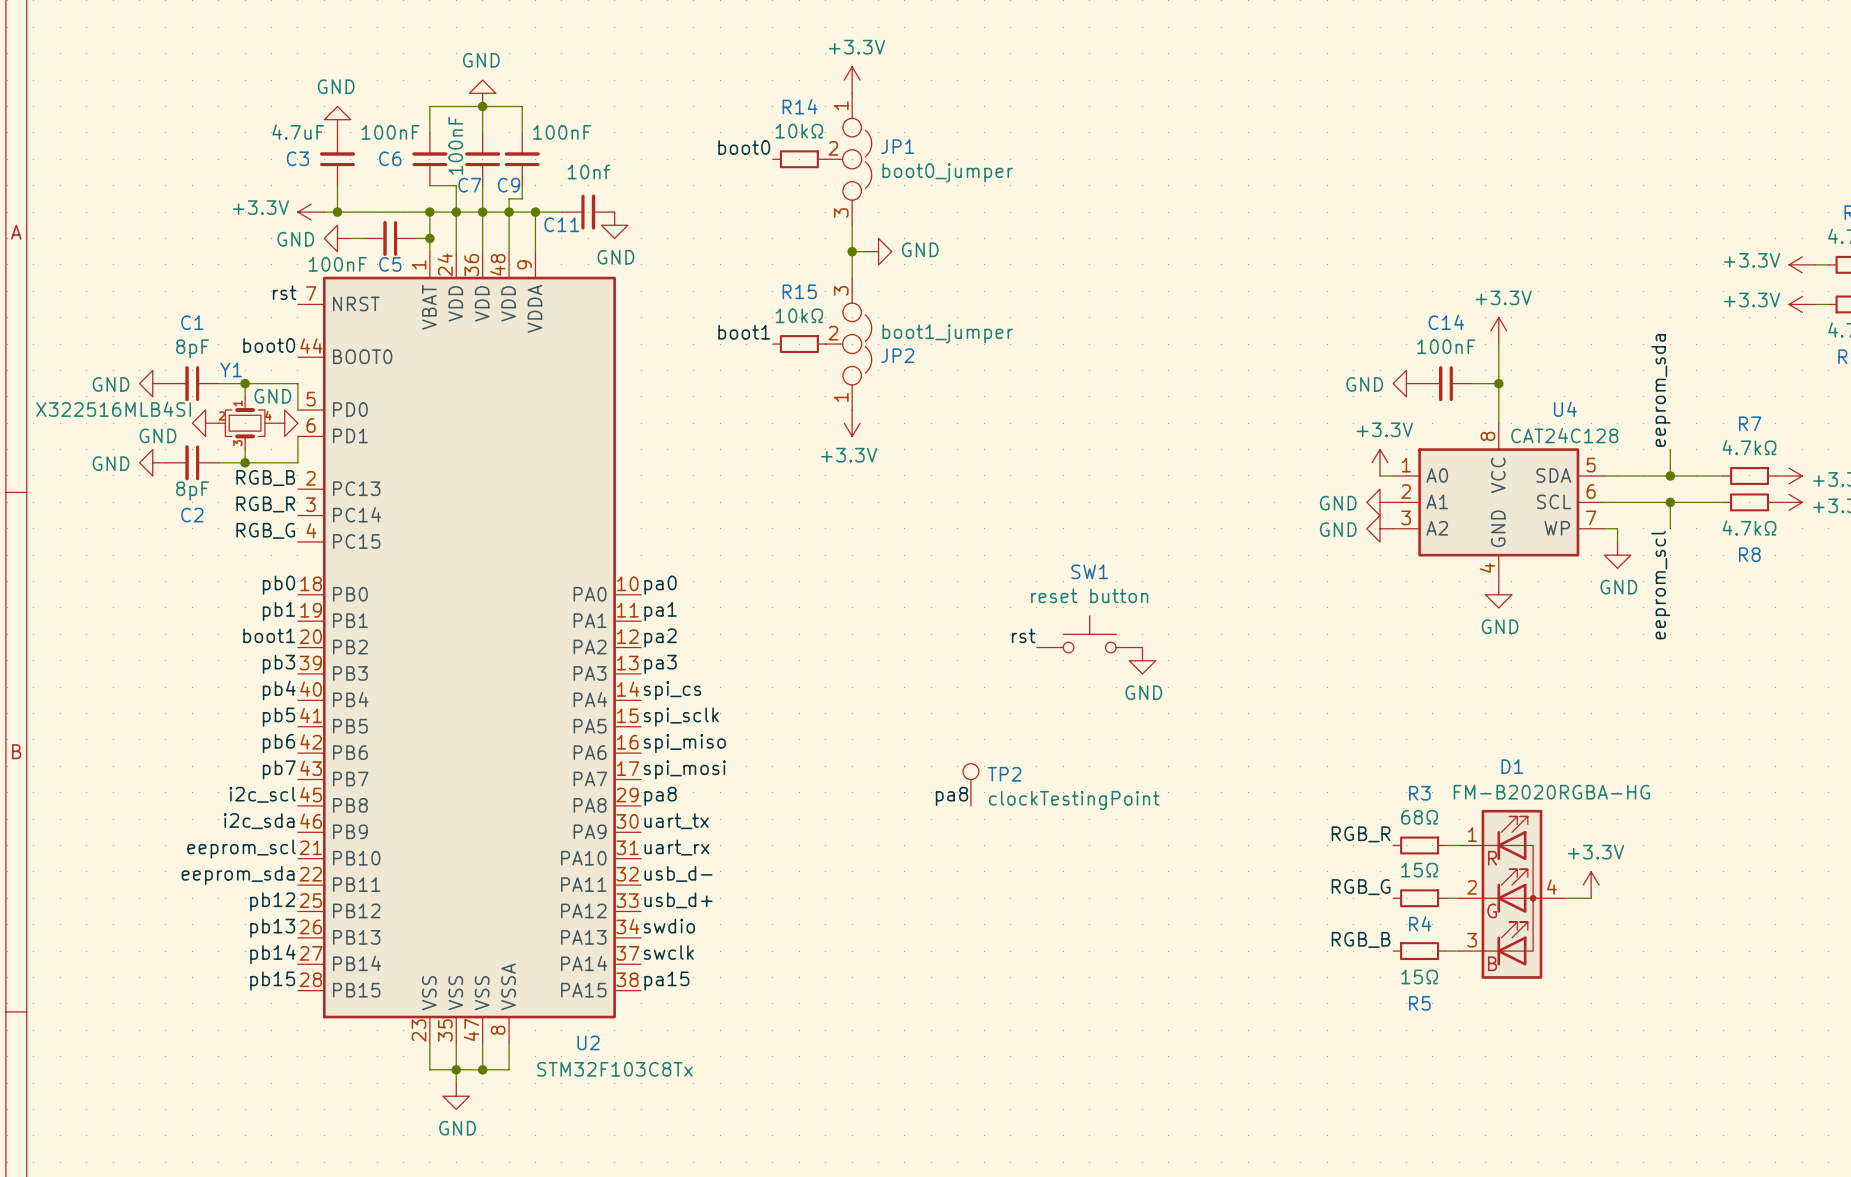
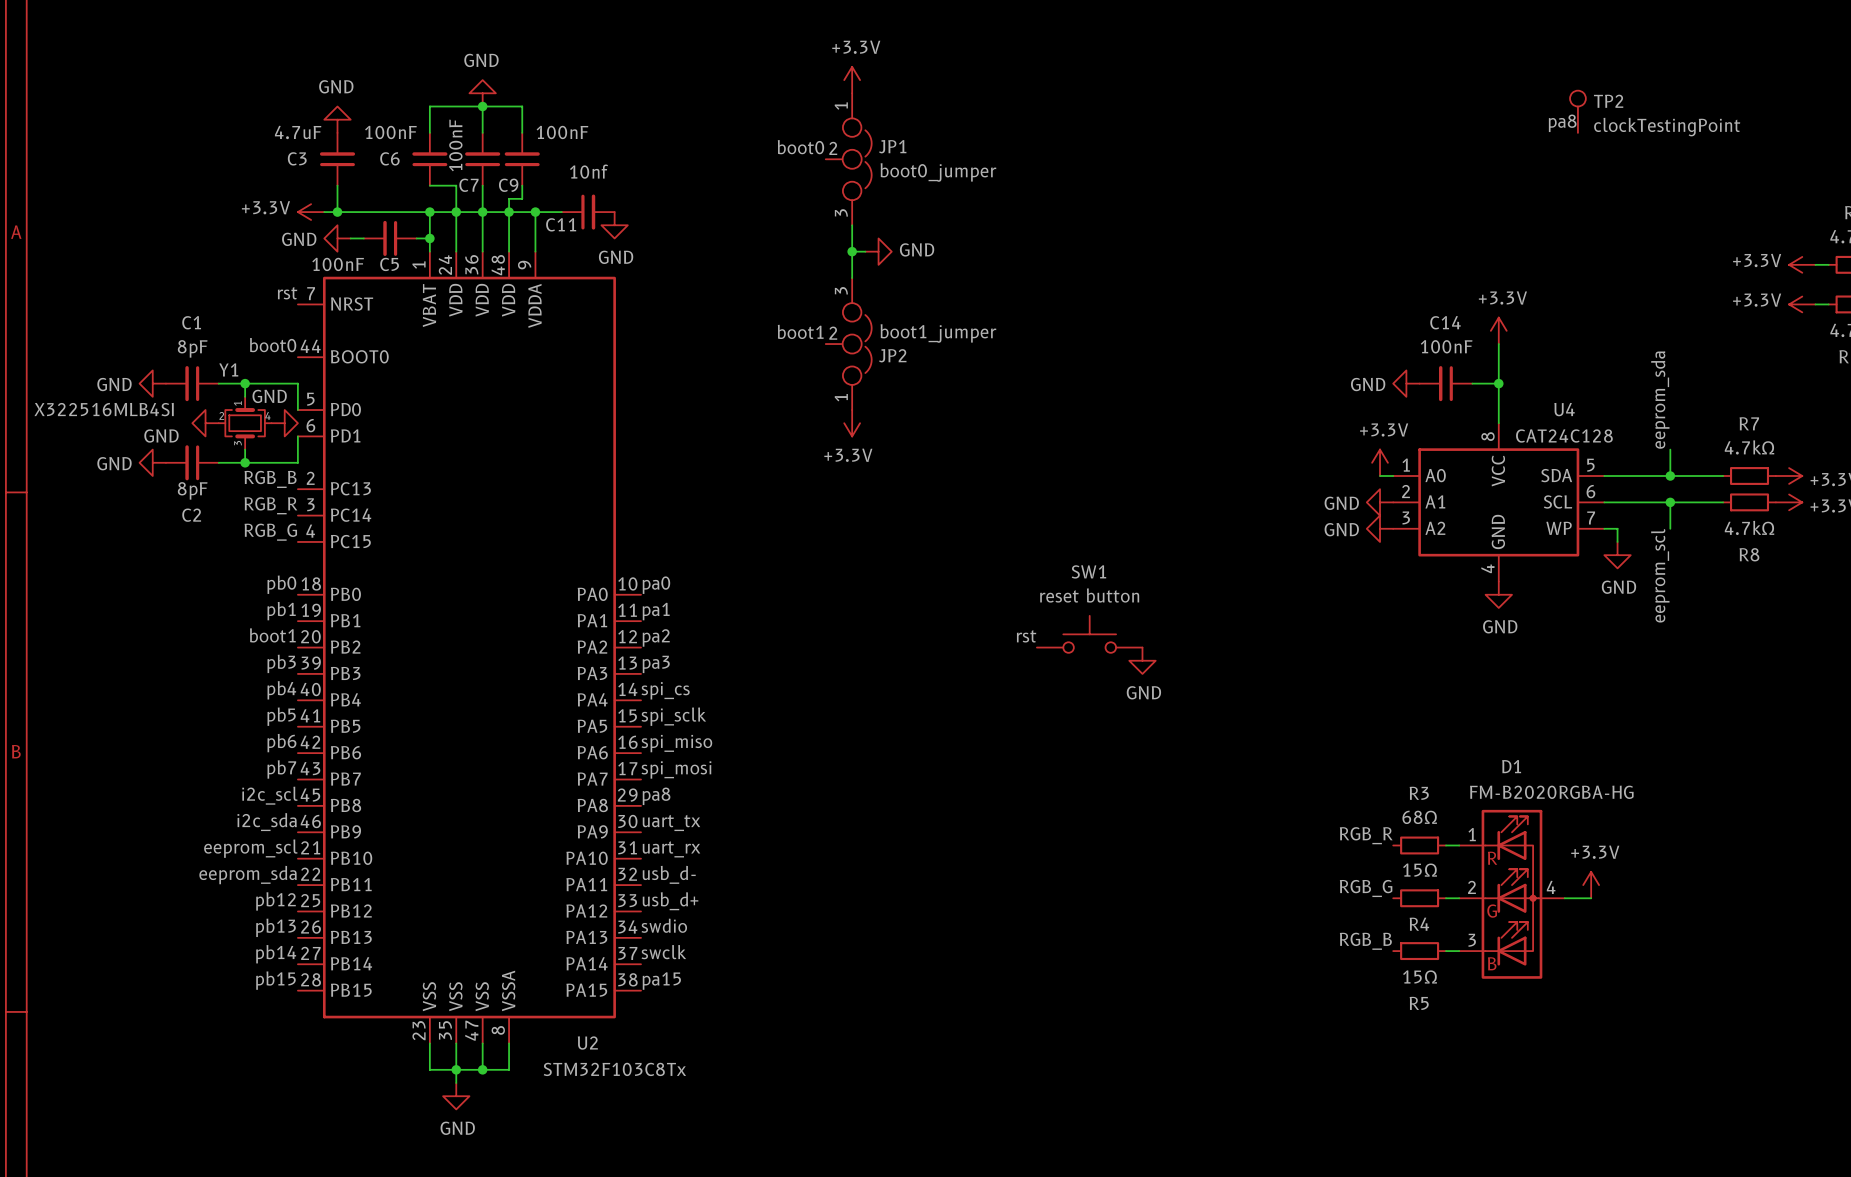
label: none -> pa8 (1562, 123)
label position: boot0 (744, 147) -> boot0 (800, 147)
R14: 10kΩ (799, 159) -> none
label position: boot1 (744, 332) -> boot1 (800, 331)
R15: 10kΩ (799, 344) -> none
TP2 position: (970, 784) -> (1577, 111)
label: pa8 (951, 796) -> none

